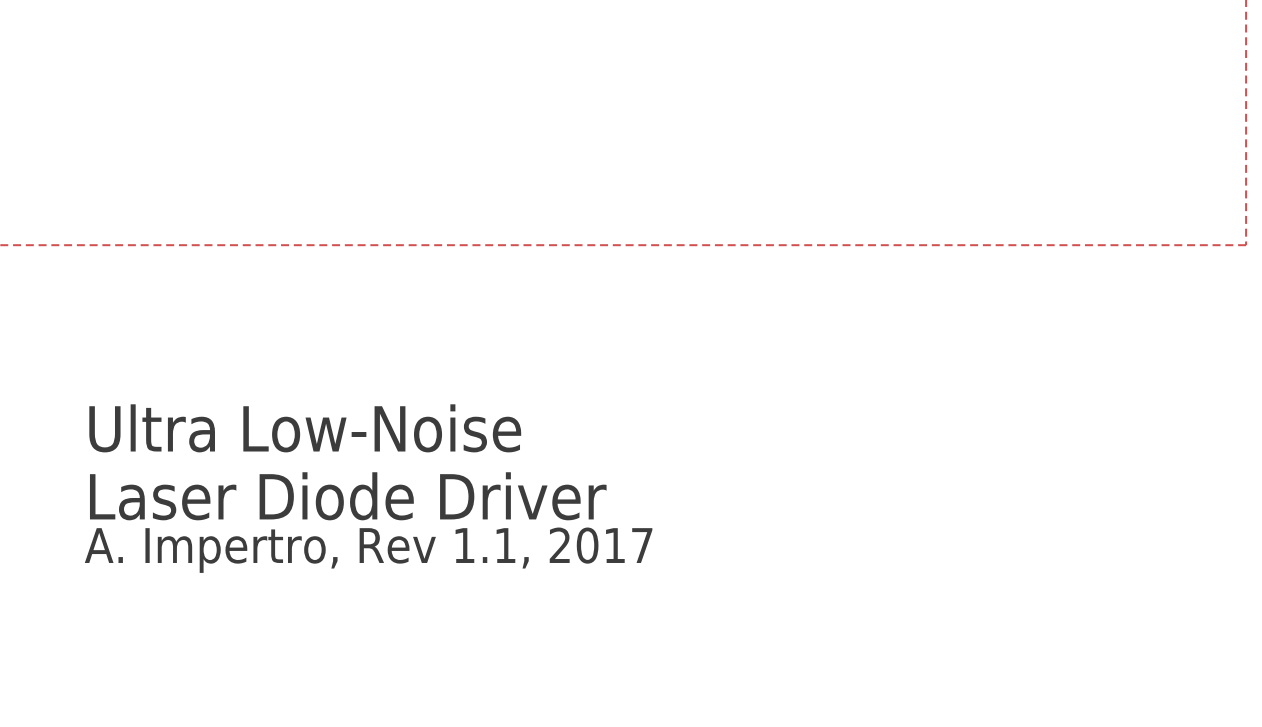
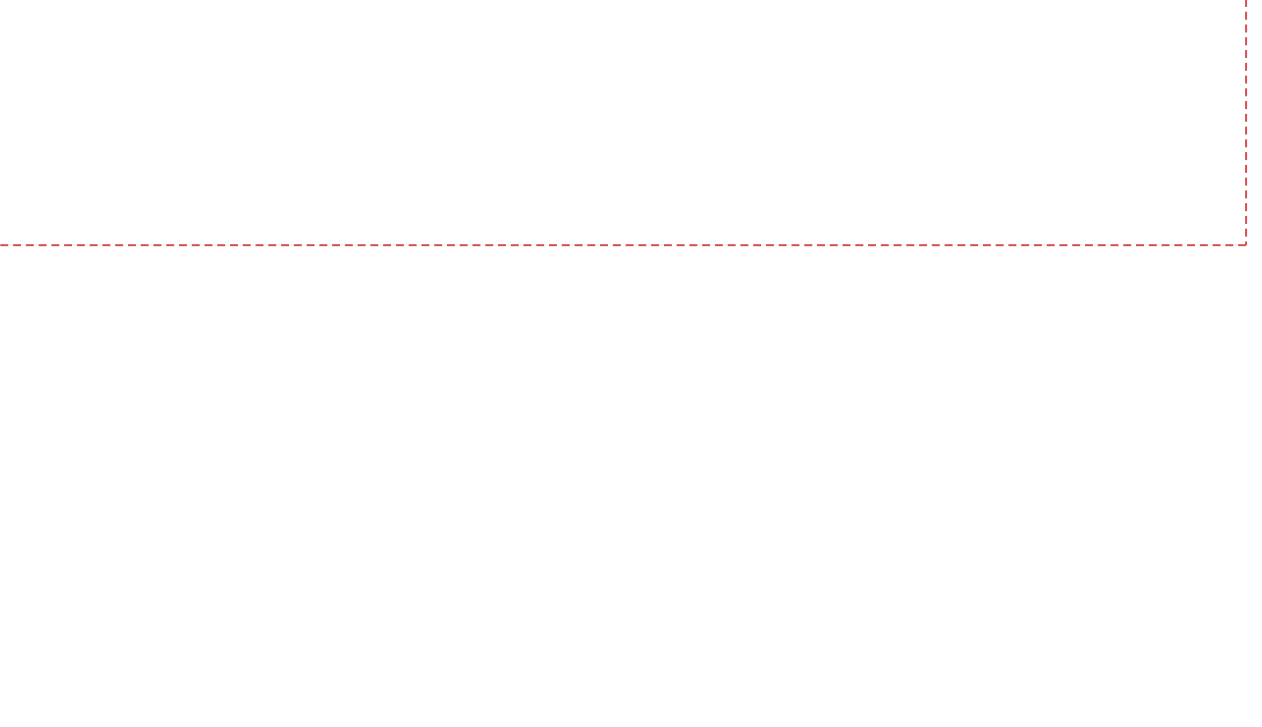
text: Ultra Low-Noise (305, 428) -> none
text: Laser Diode Driver (348, 496) -> none
text: A. Impertro, Rev 1.1, 2017 (368, 550) -> none

